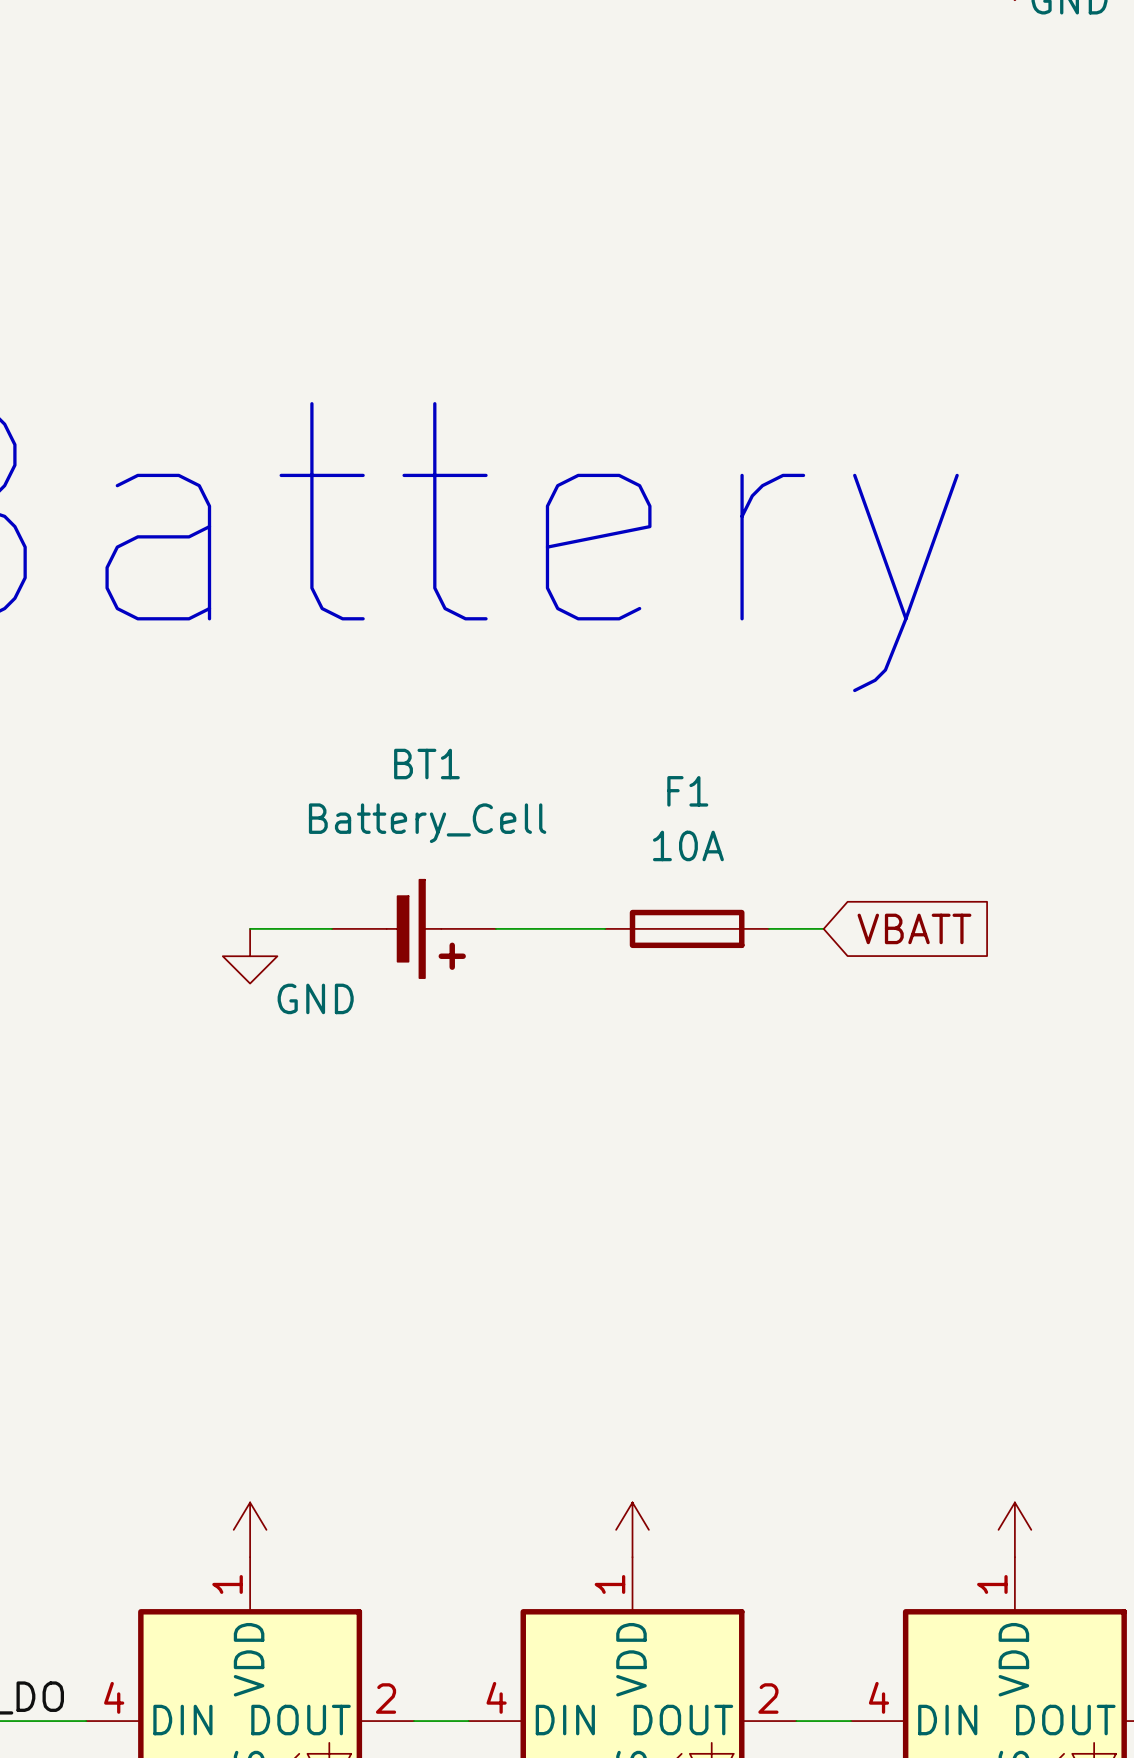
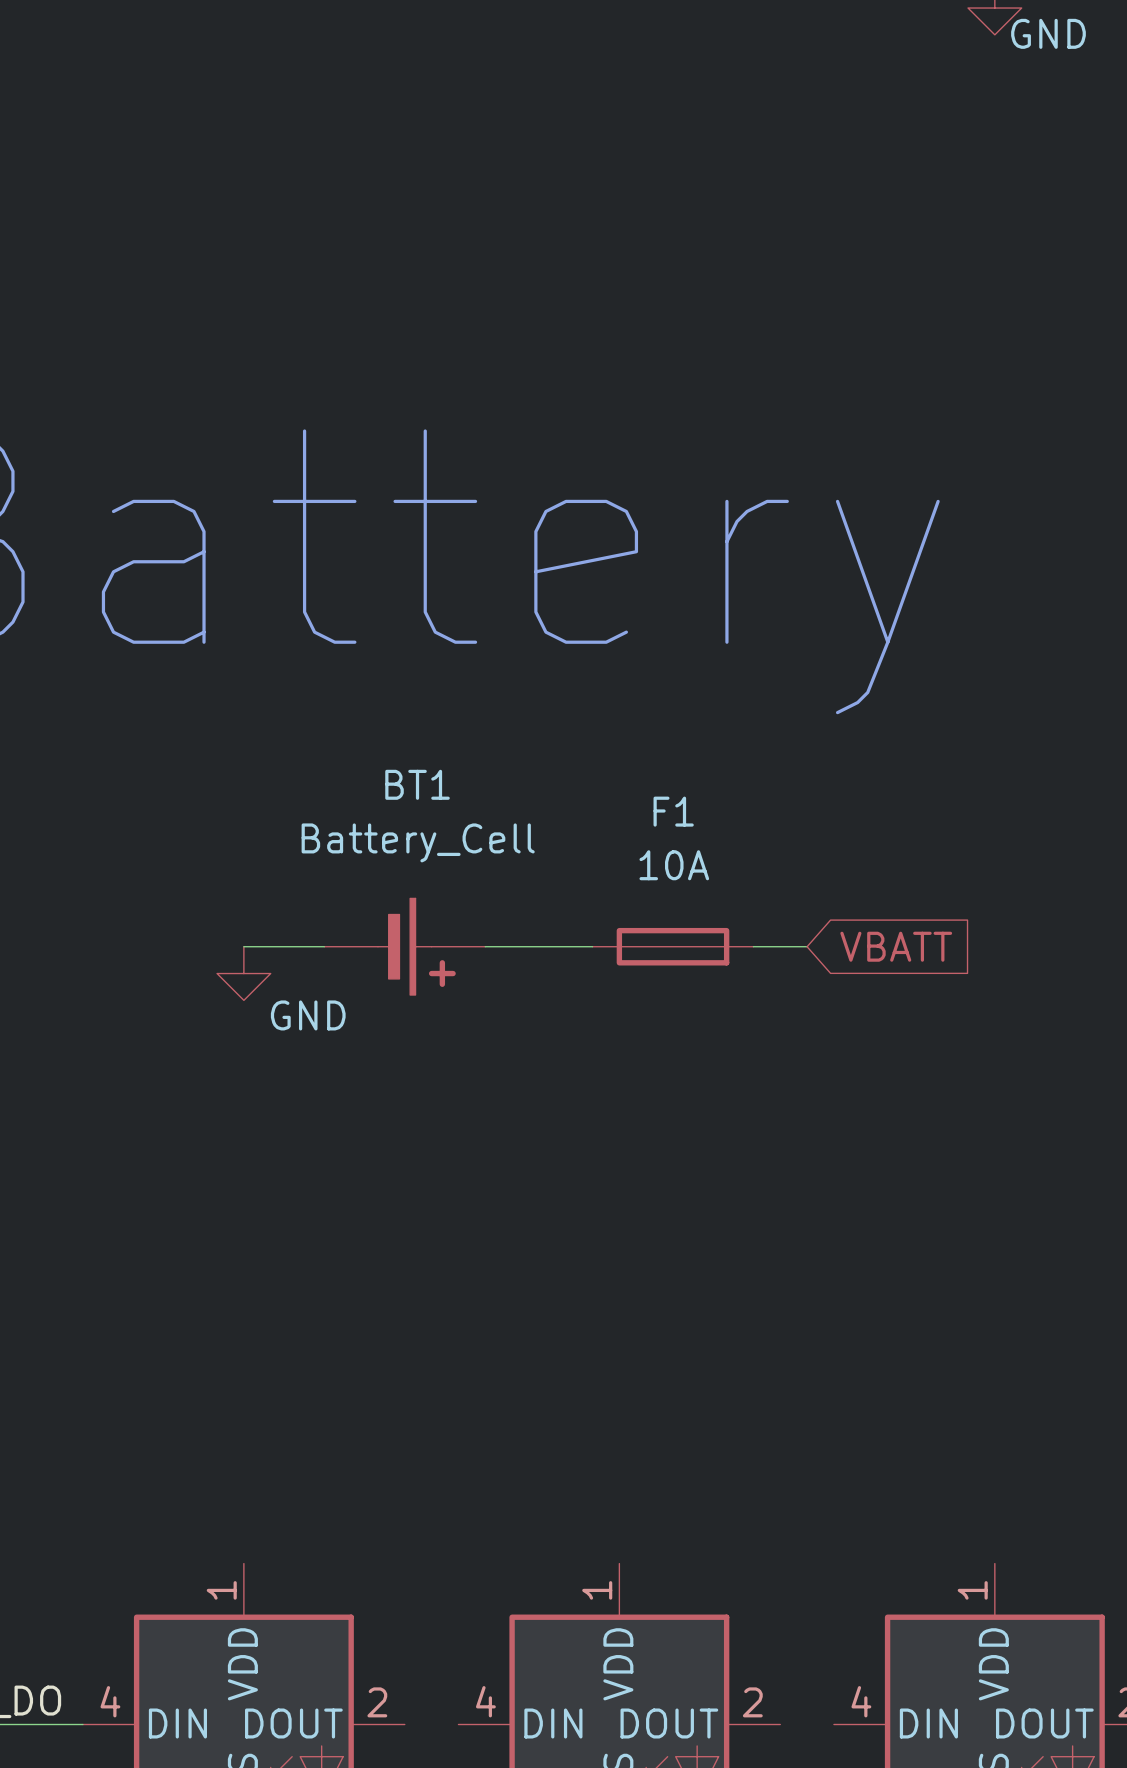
power symbol: (250, 1529) -> none
power symbol: (632, 1529) -> none
power symbol: (1014, 1529) -> none
wire: (413, 1721) (468, 1721) -> none
wire: (796, 1721) (851, 1721) -> none

